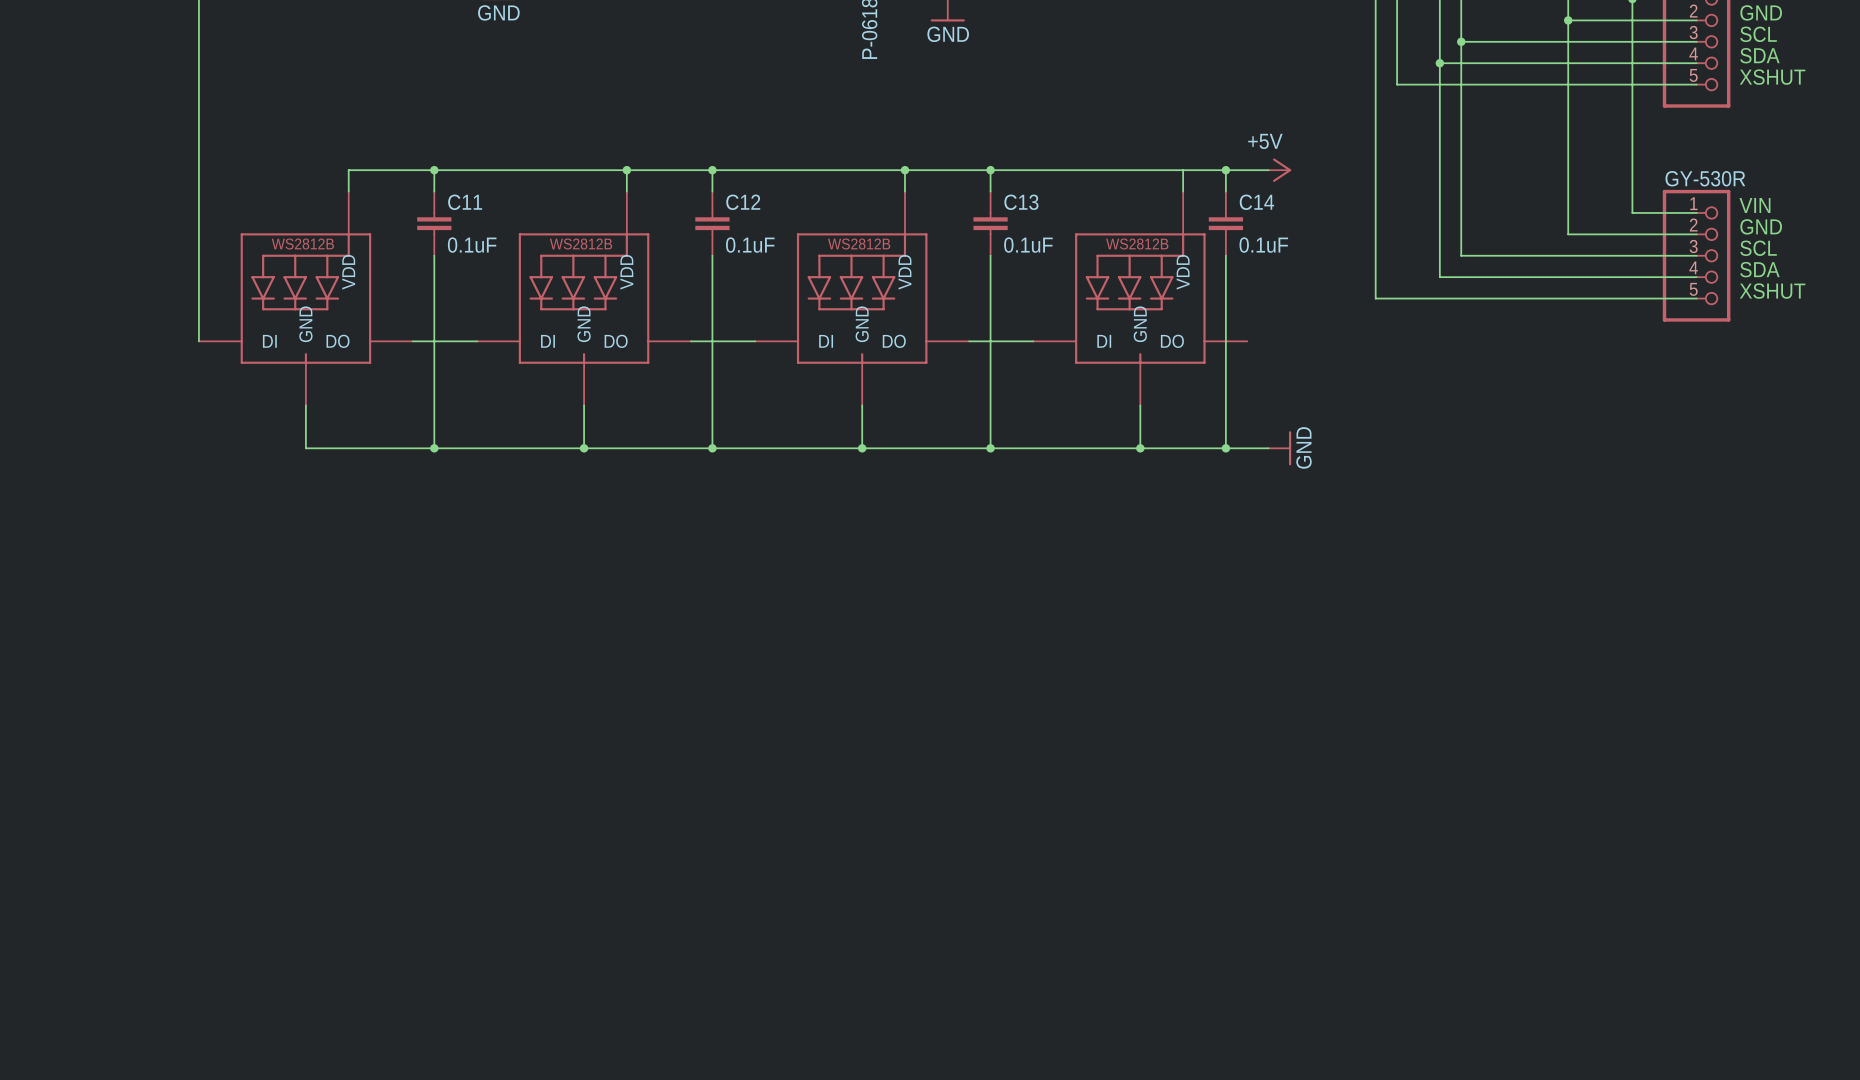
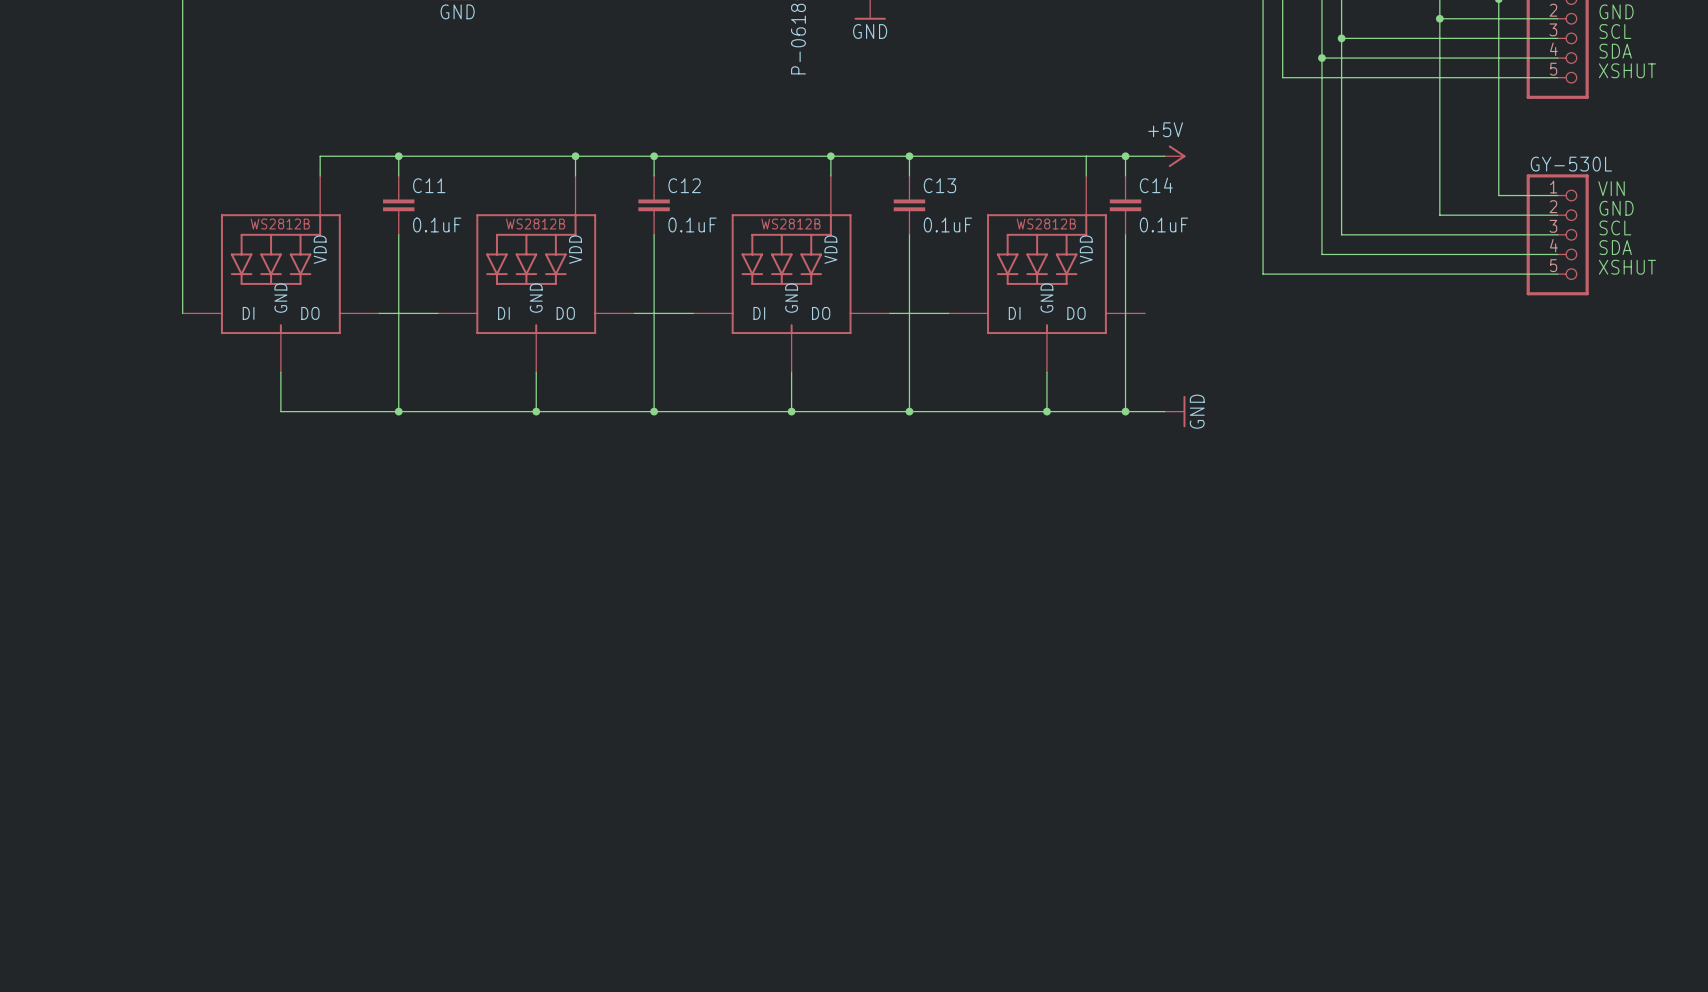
GY-530R name: GY-530R (1705, 178) -> GY-530L (1571, 164)

